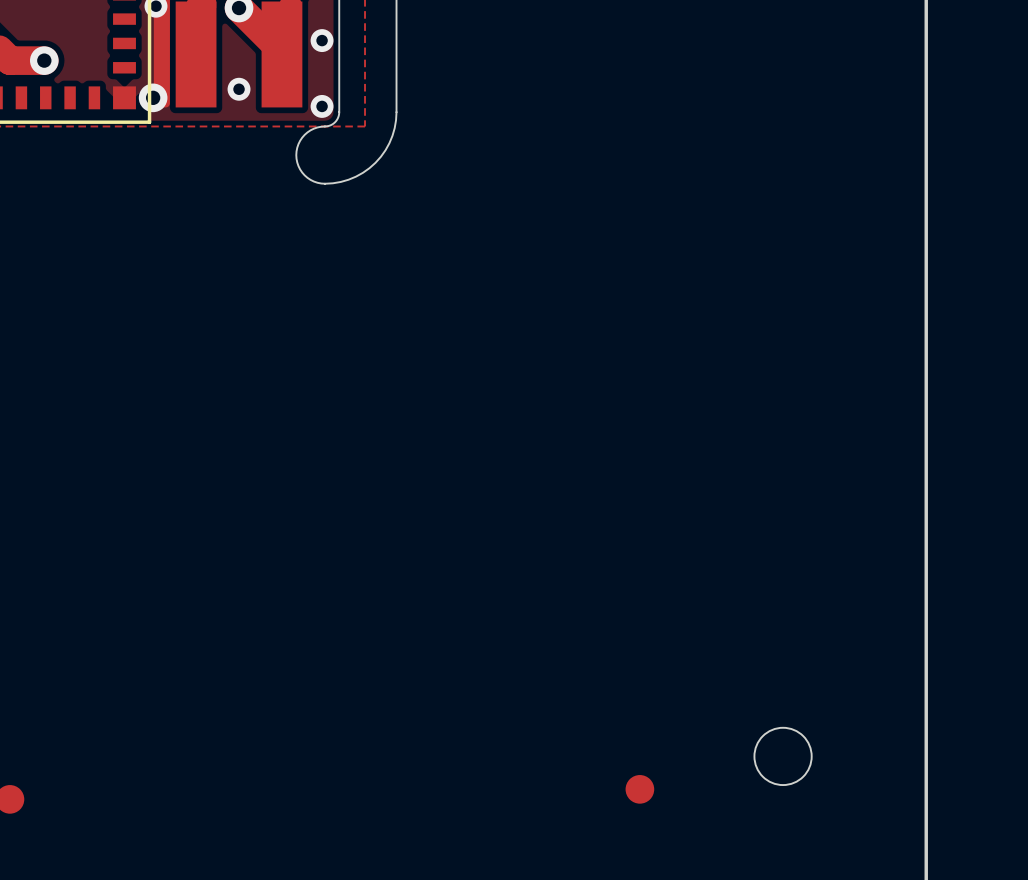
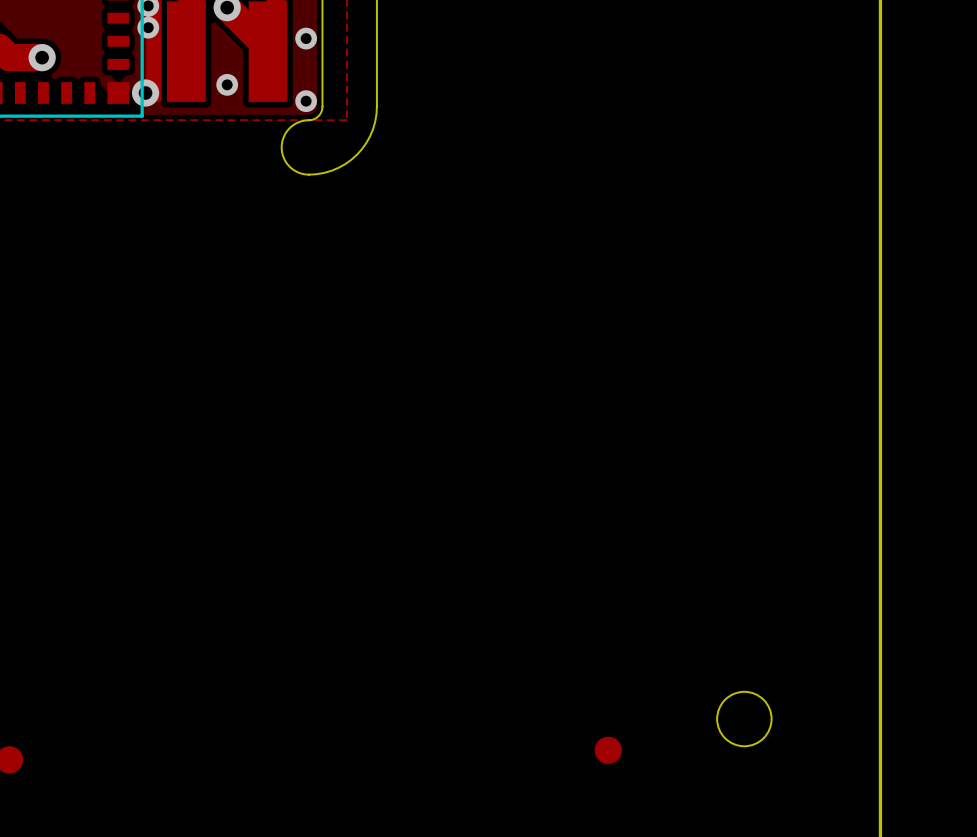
via: none -> (148, 27)

